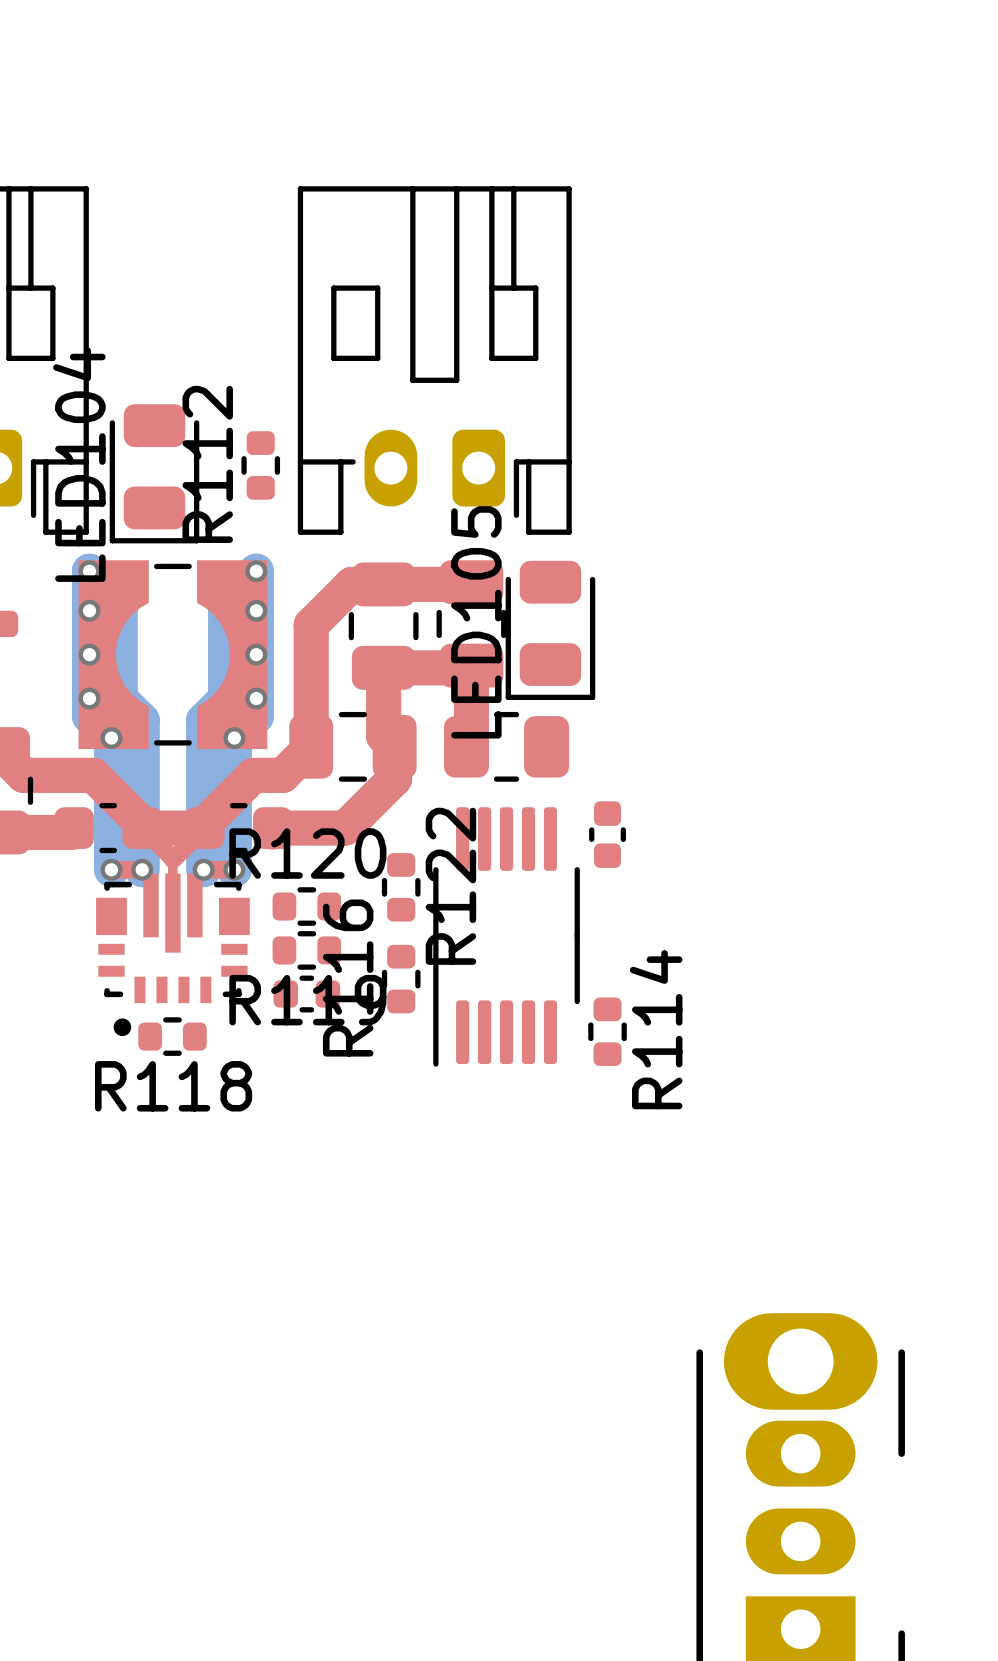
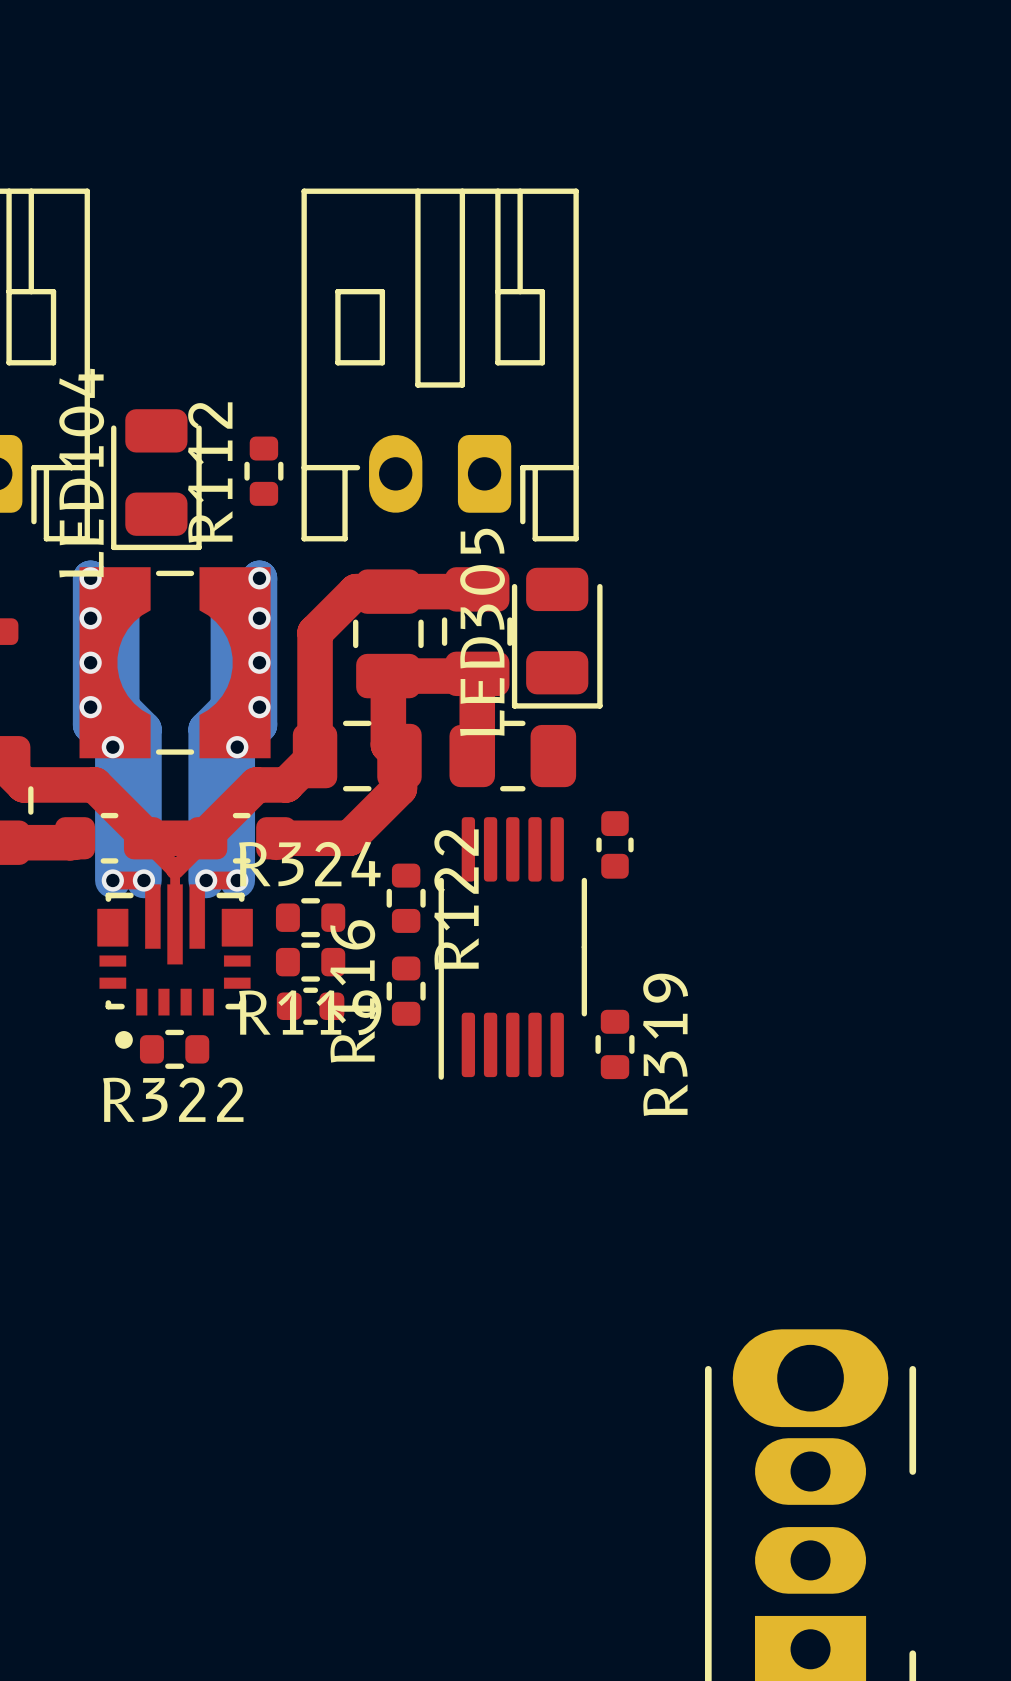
LED105 name: LED105 (476, 622) -> LED305 (482, 632)
R120 name: R120 (307, 853) -> R324 (309, 864)
R114 name: R114 (656, 1029) -> R319 (665, 1044)
R118 name: R118 (173, 1086) -> R322 (173, 1099)

